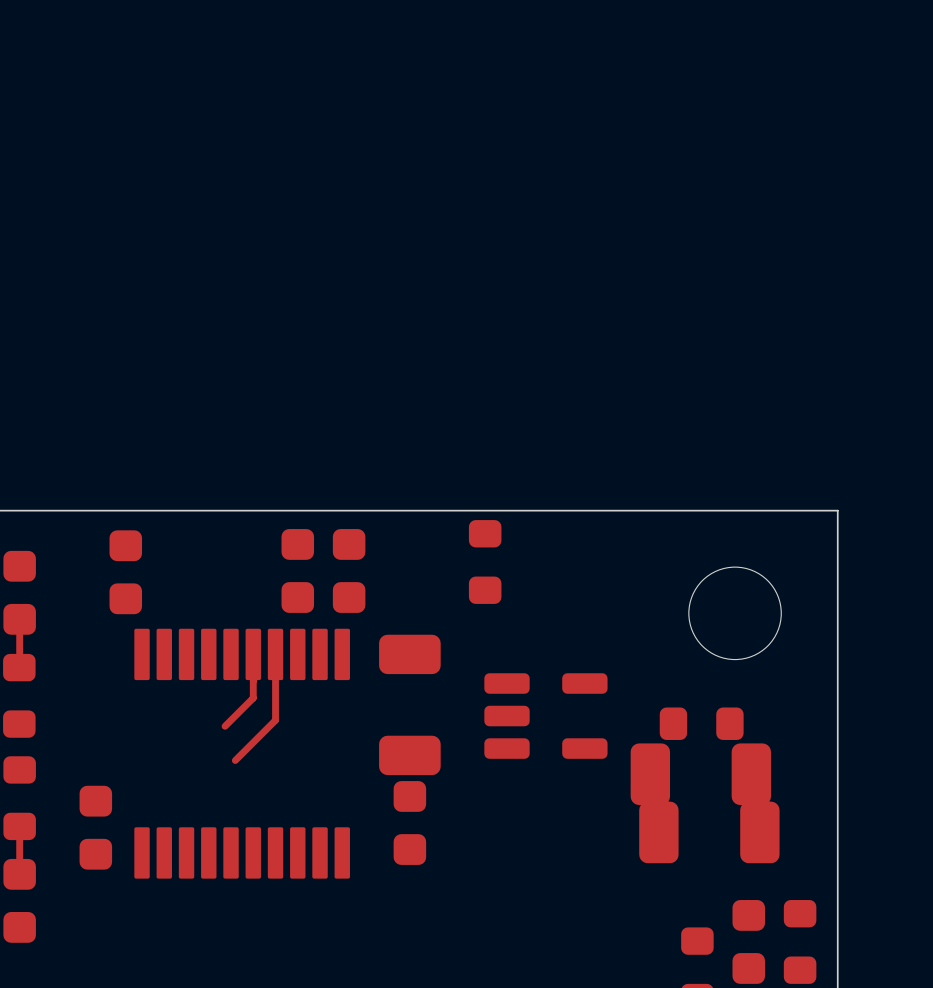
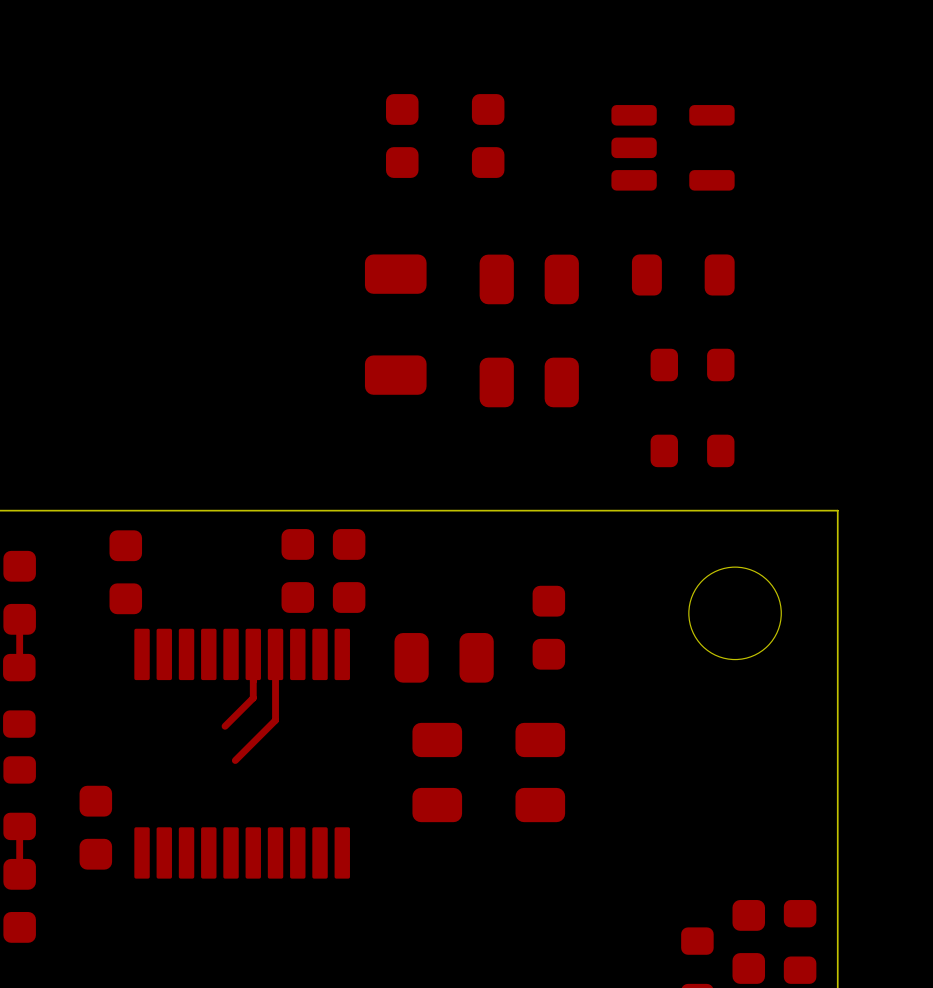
part: none -> (402, 136)
part: none -> (488, 136)
part: none -> (683, 274)
part: none -> (529, 279)
part: none -> (395, 324)
part: none -> (692, 365)
part: none -> (529, 382)
part: none -> (692, 450)
part: (485, 561) -> none
part: none -> (444, 657)
part: (409, 704) -> none
part position: (545, 716) -> (673, 147)
part: (701, 723) -> none
part: none -> (437, 772)
part: none -> (540, 772)
part: (700, 774) -> none
part position: (409, 822) -> (548, 627)
part: (709, 832) -> none

